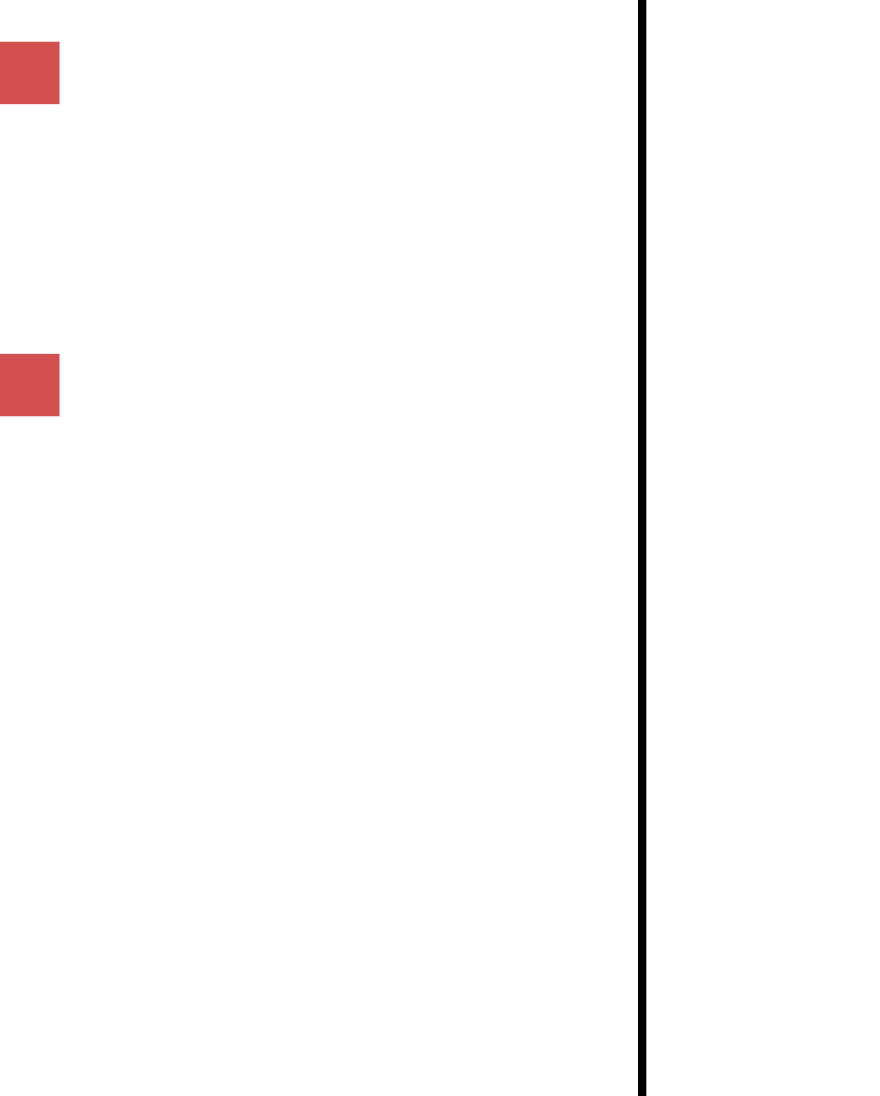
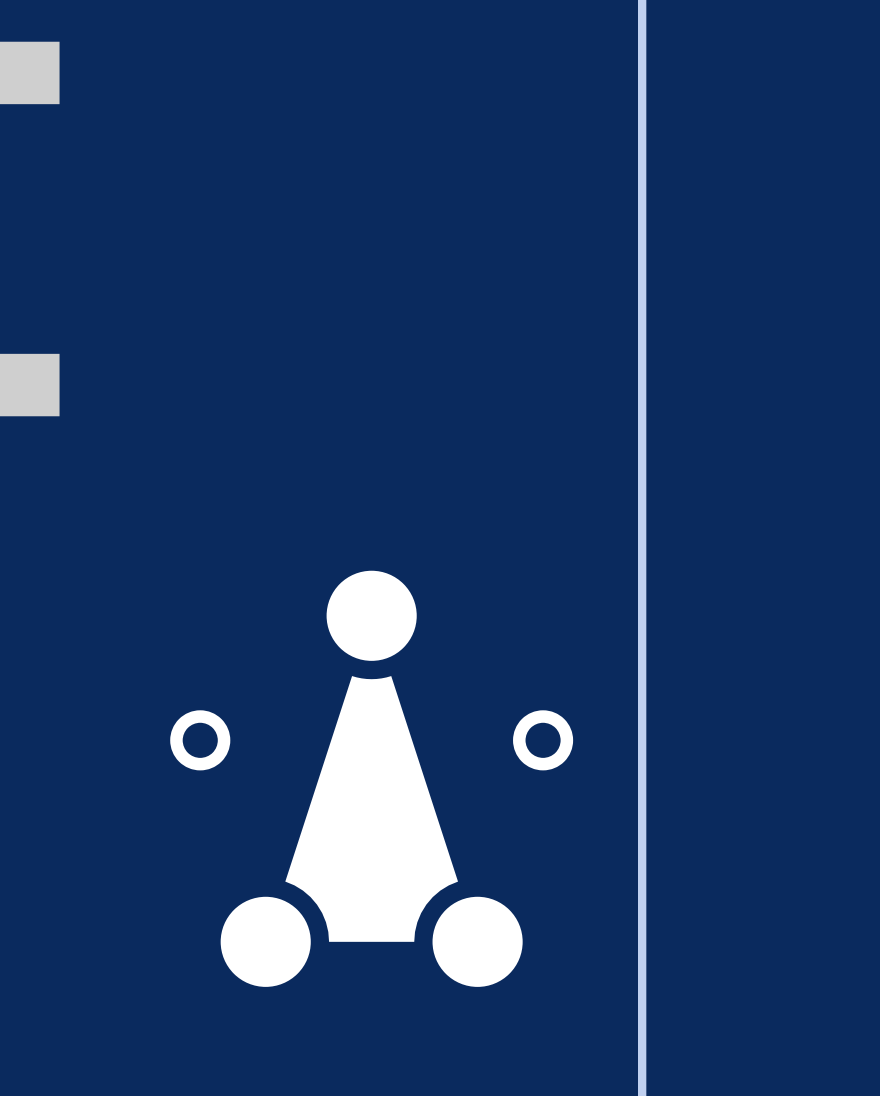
drawing: none -> [170, 570, 574, 987]

